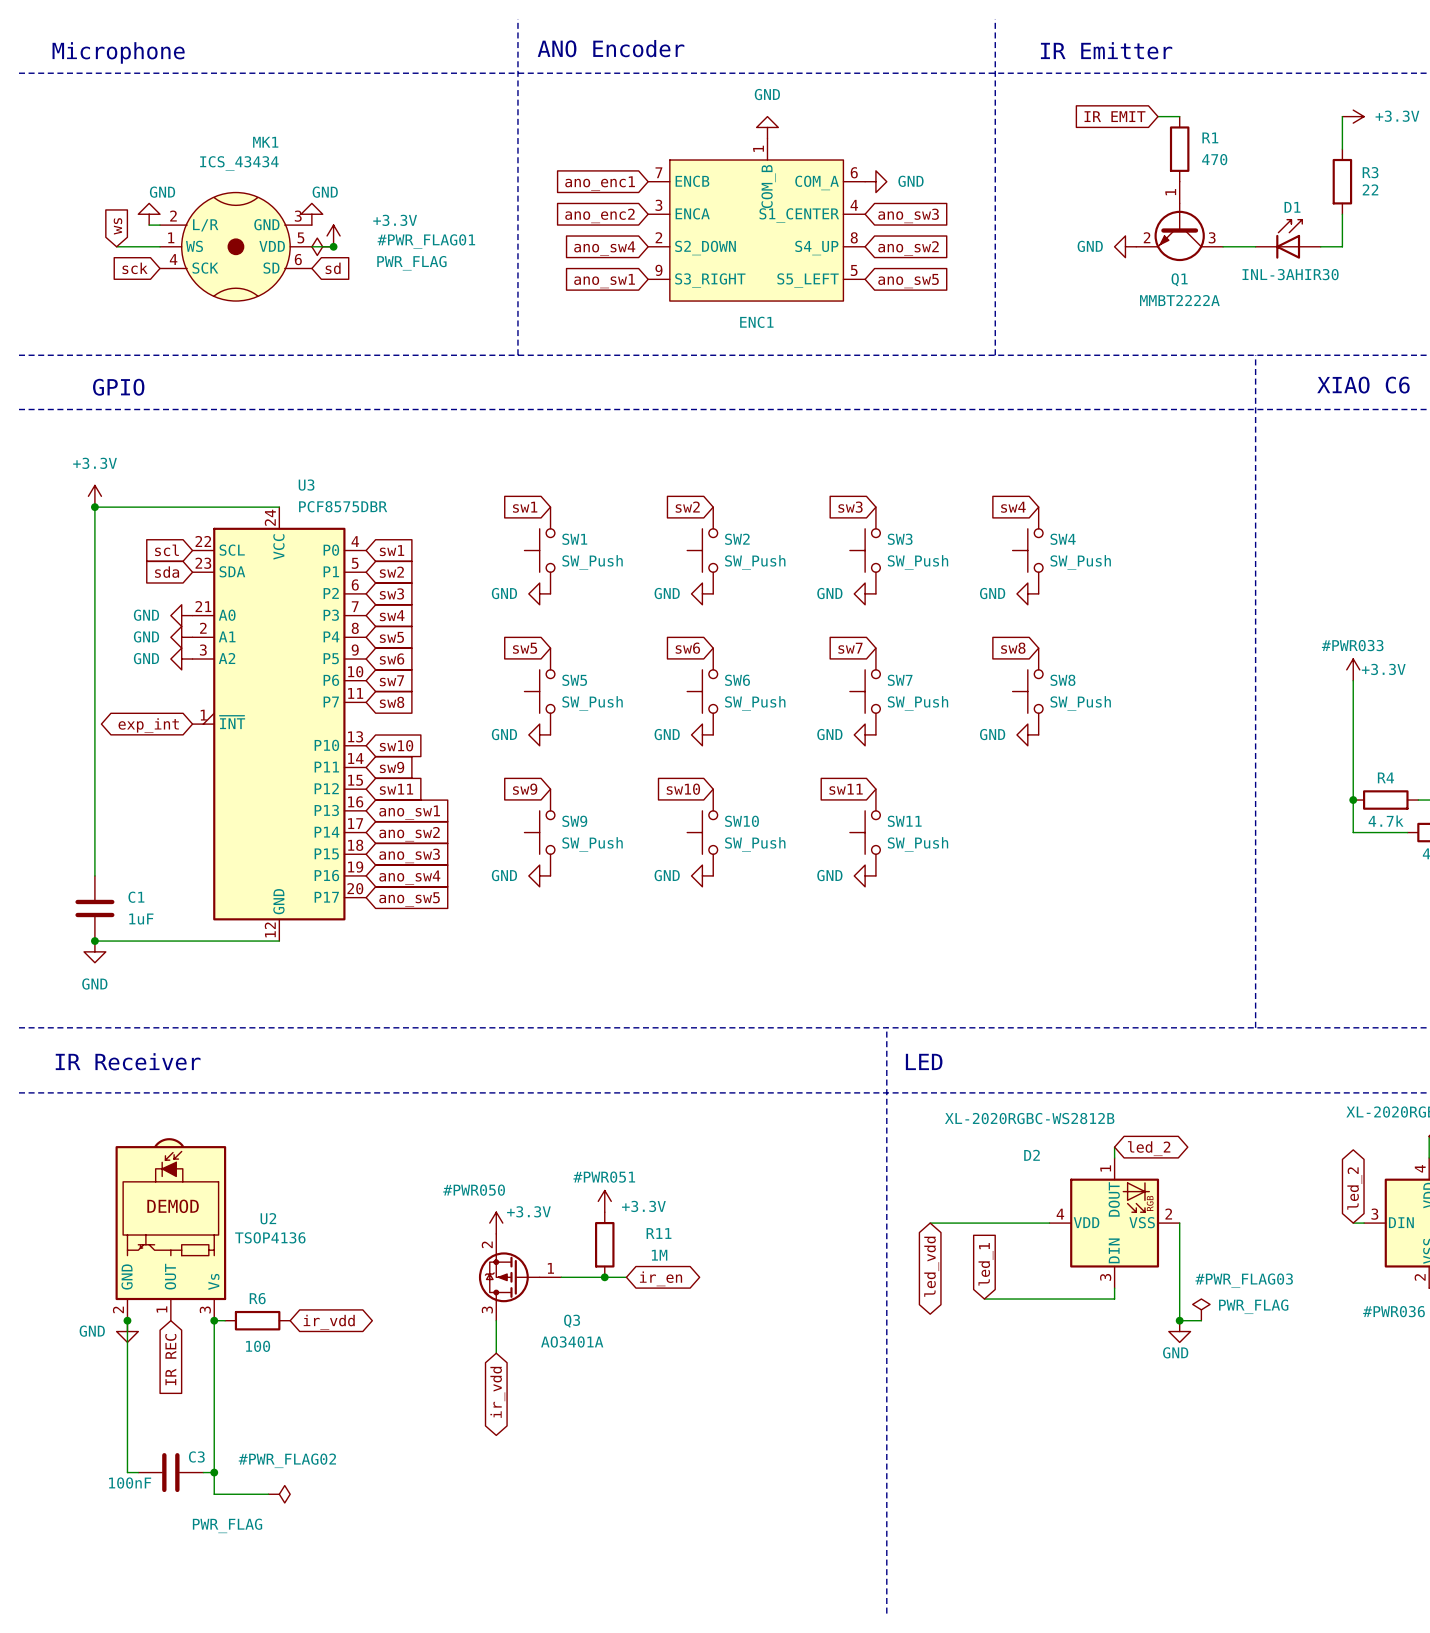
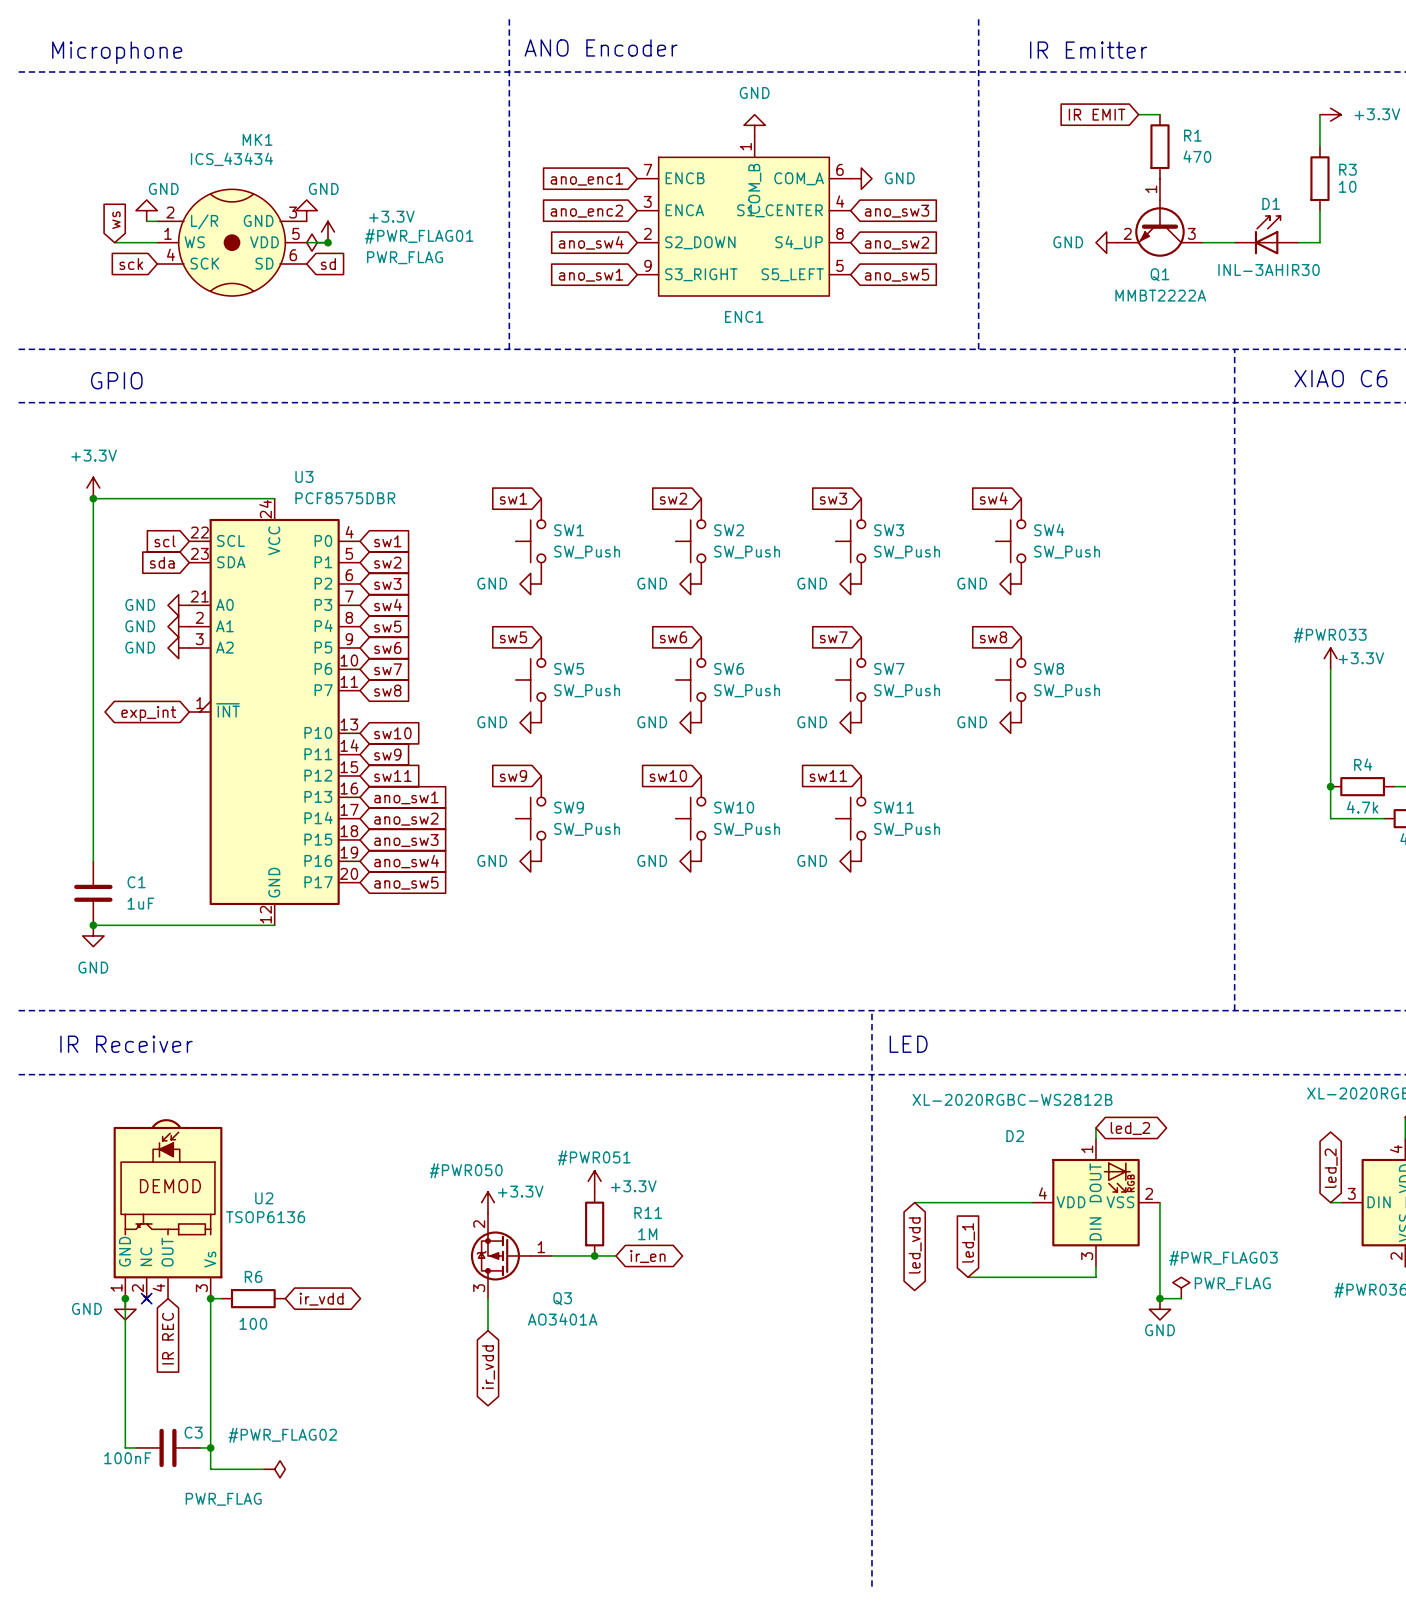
R3 value: 22 (1370, 189) -> 10 (1347, 186)
U2 symbol: [115, 1138, 227, 1321] -> [113, 1119, 223, 1302]
U2 value: TSOP4136 (270, 1237) -> TSOP6136 (265, 1217)
no-connect mark: none -> (146, 1298)

